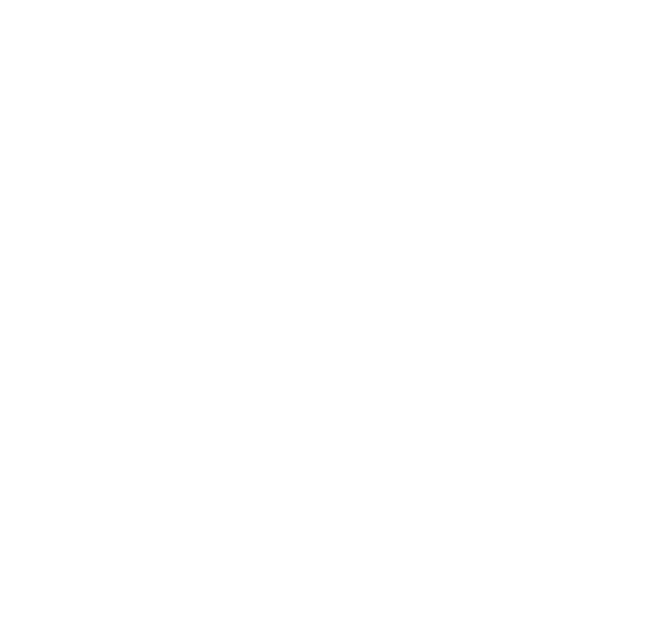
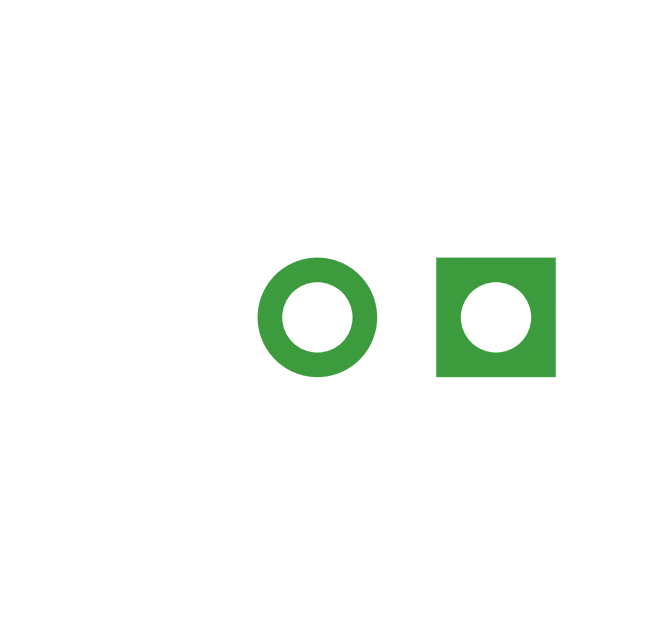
part: none -> (406, 317)

